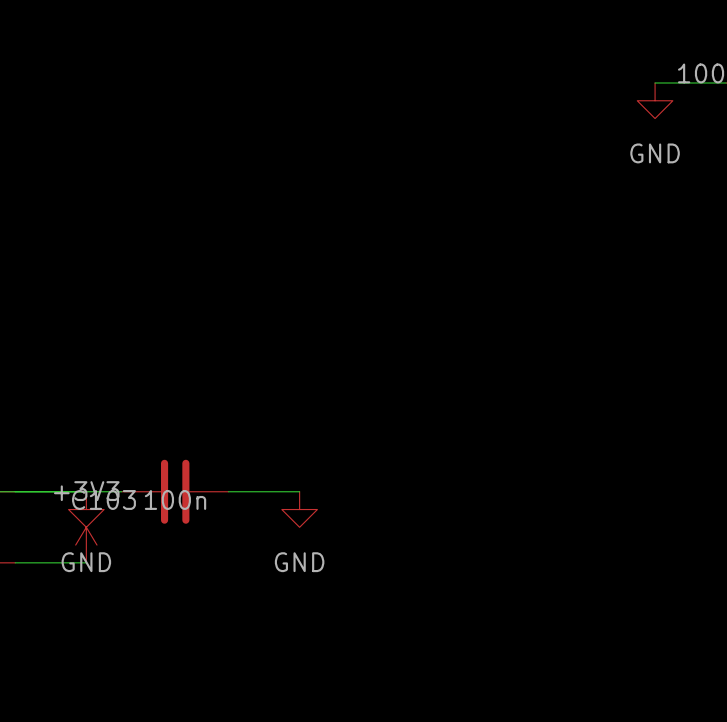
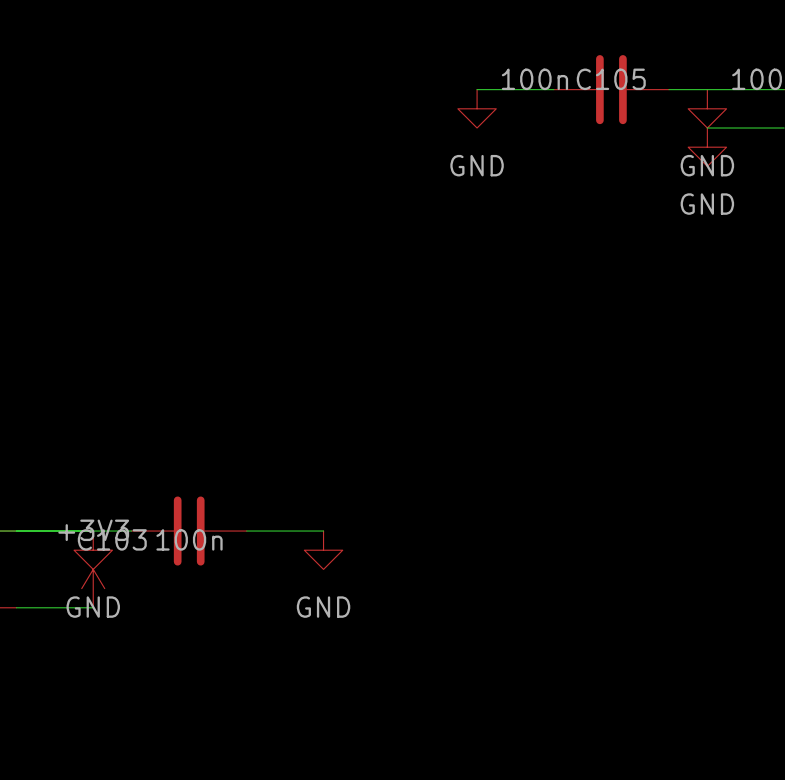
wire: none -> (477, 89) (553, 89)
C105: none -> 100n (611, 89)
wire: none -> (668, 89) (707, 89)
power symbol: none -> GND (477, 108)
wire: none -> (707, 128) (784, 128)
power symbol: none -> GND (707, 147)

